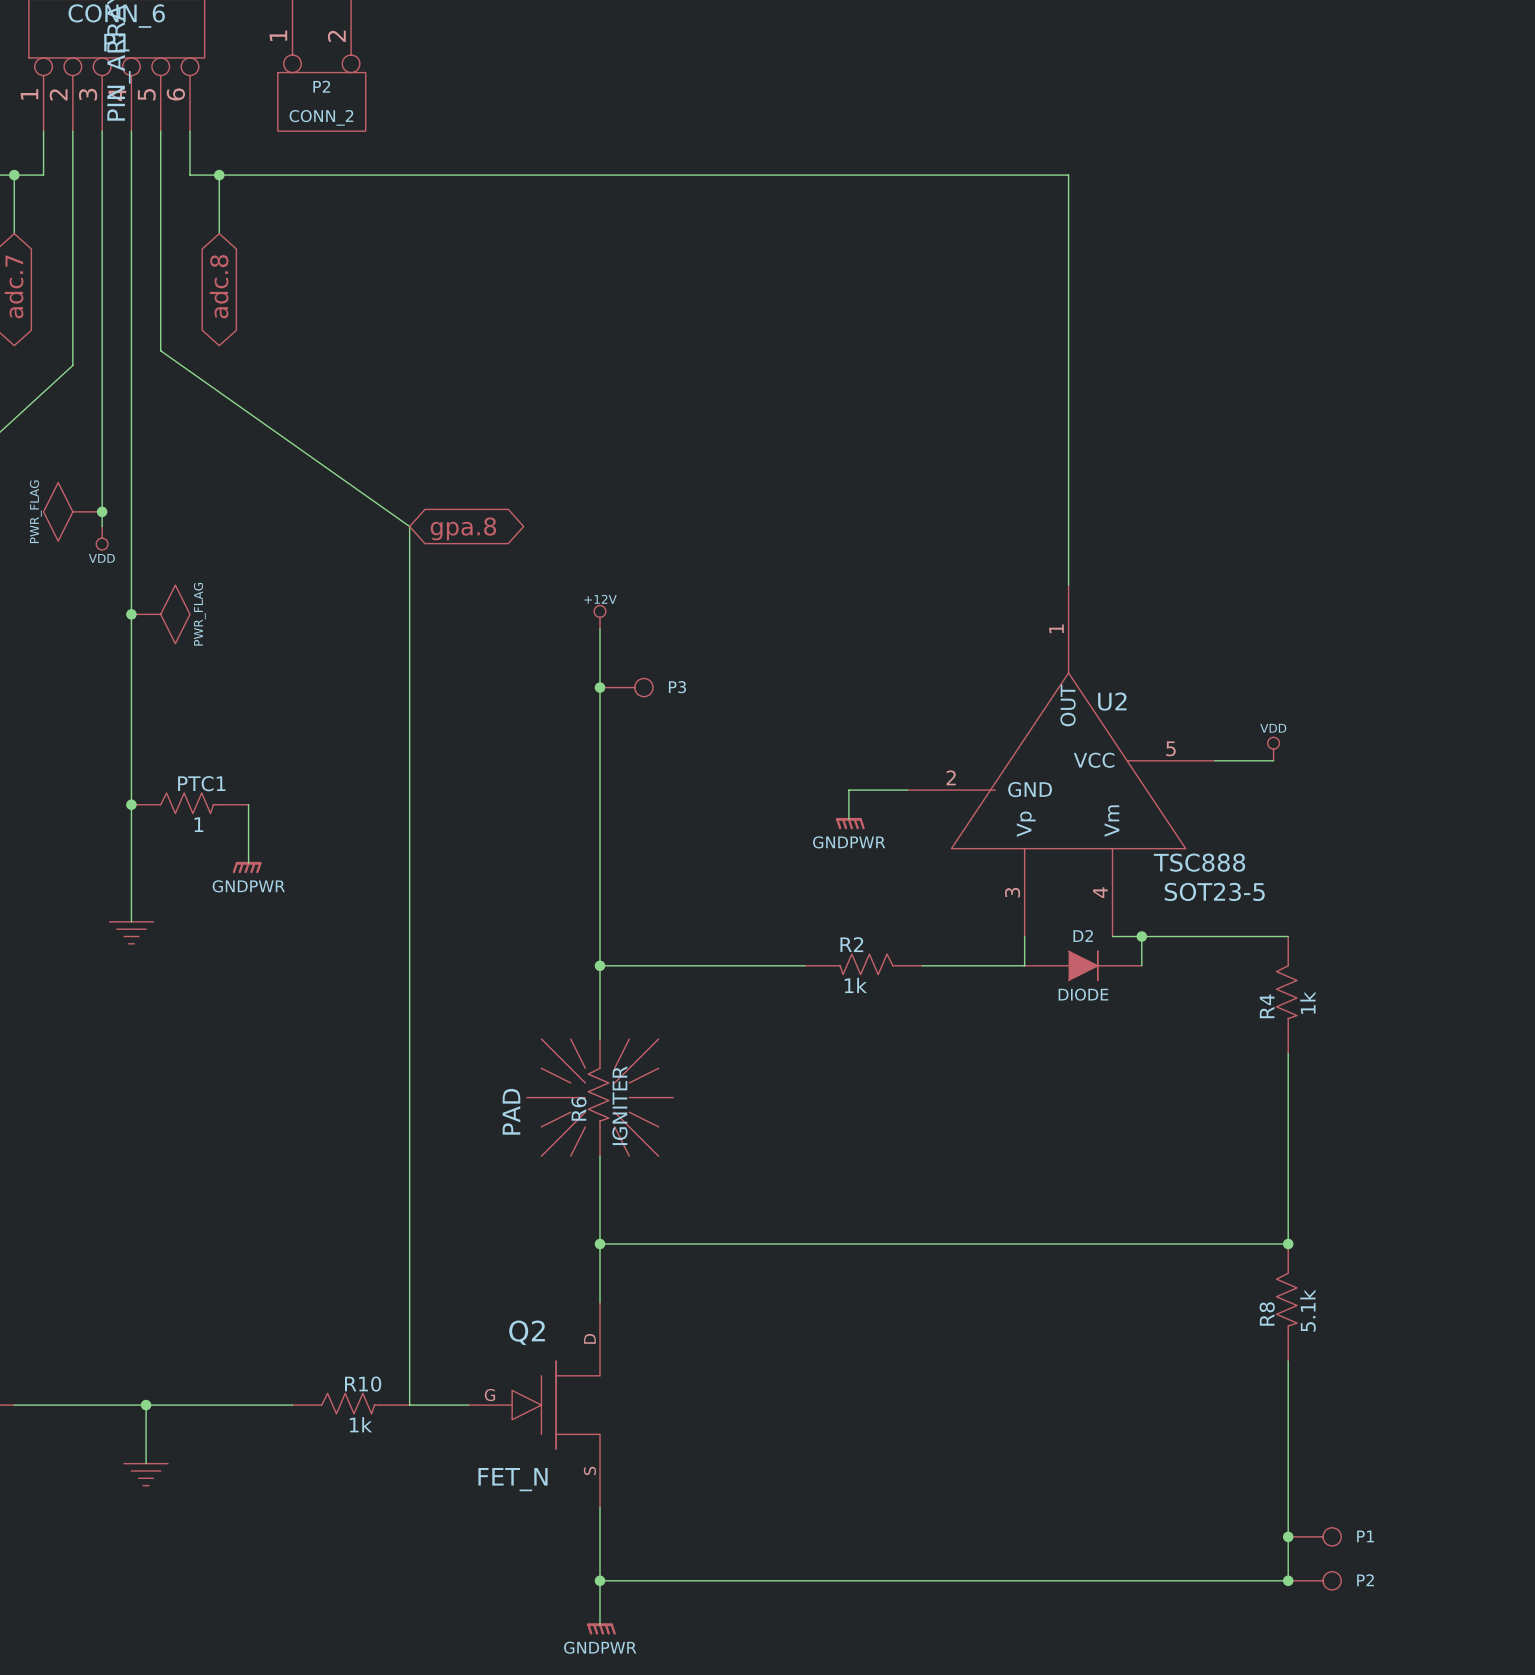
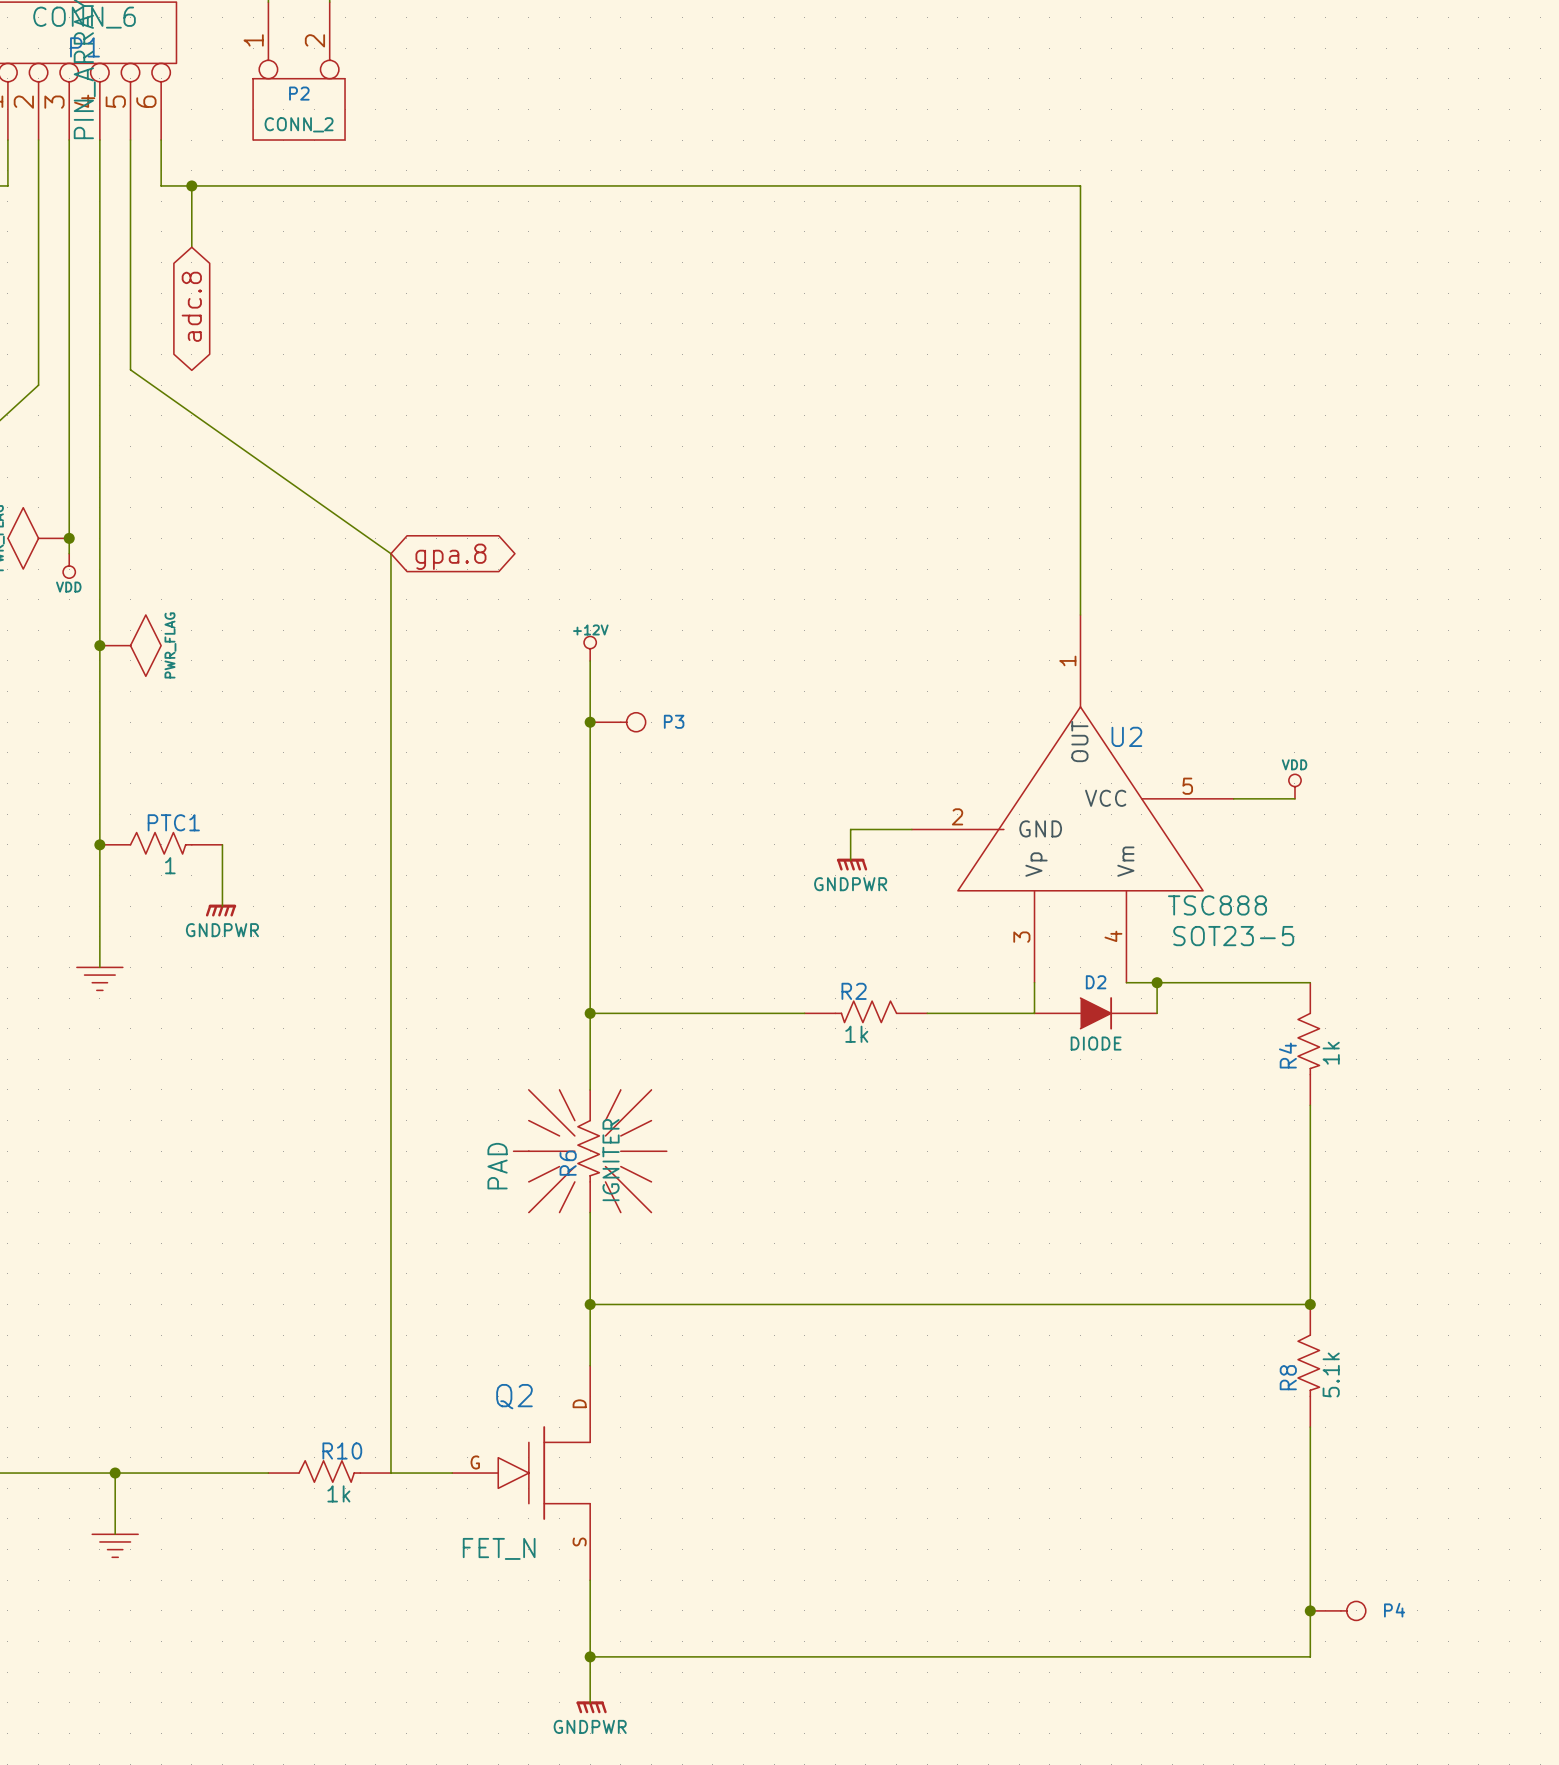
P1 name: P1 (1365, 1536) -> P4 (1394, 1610)
junction: (1288, 1580) -> none
P2: (1314, 1580) -> none

